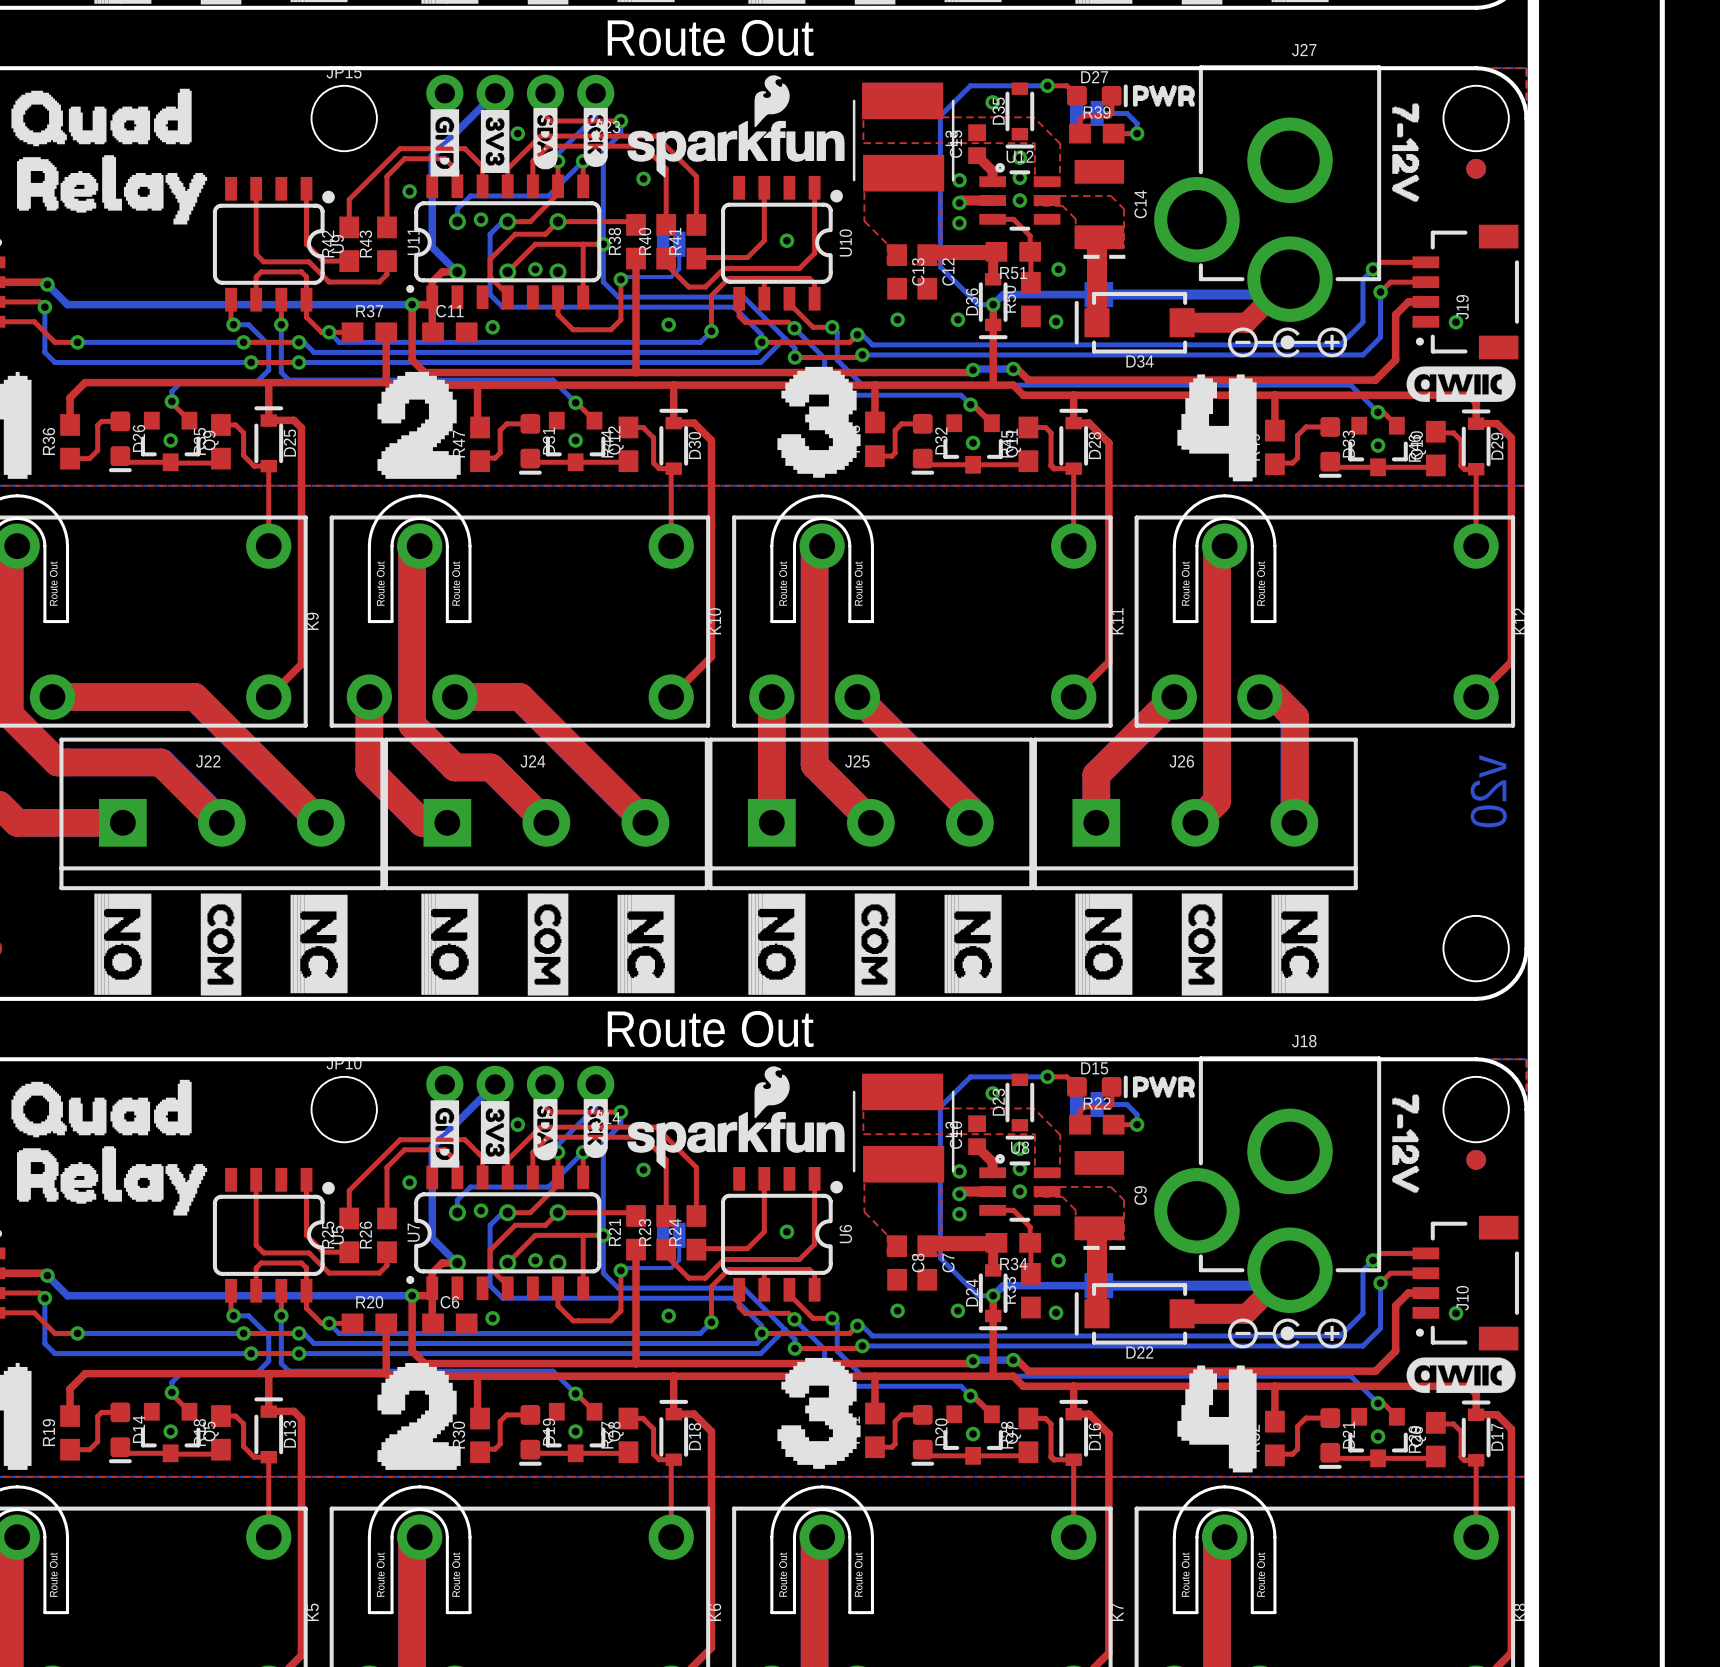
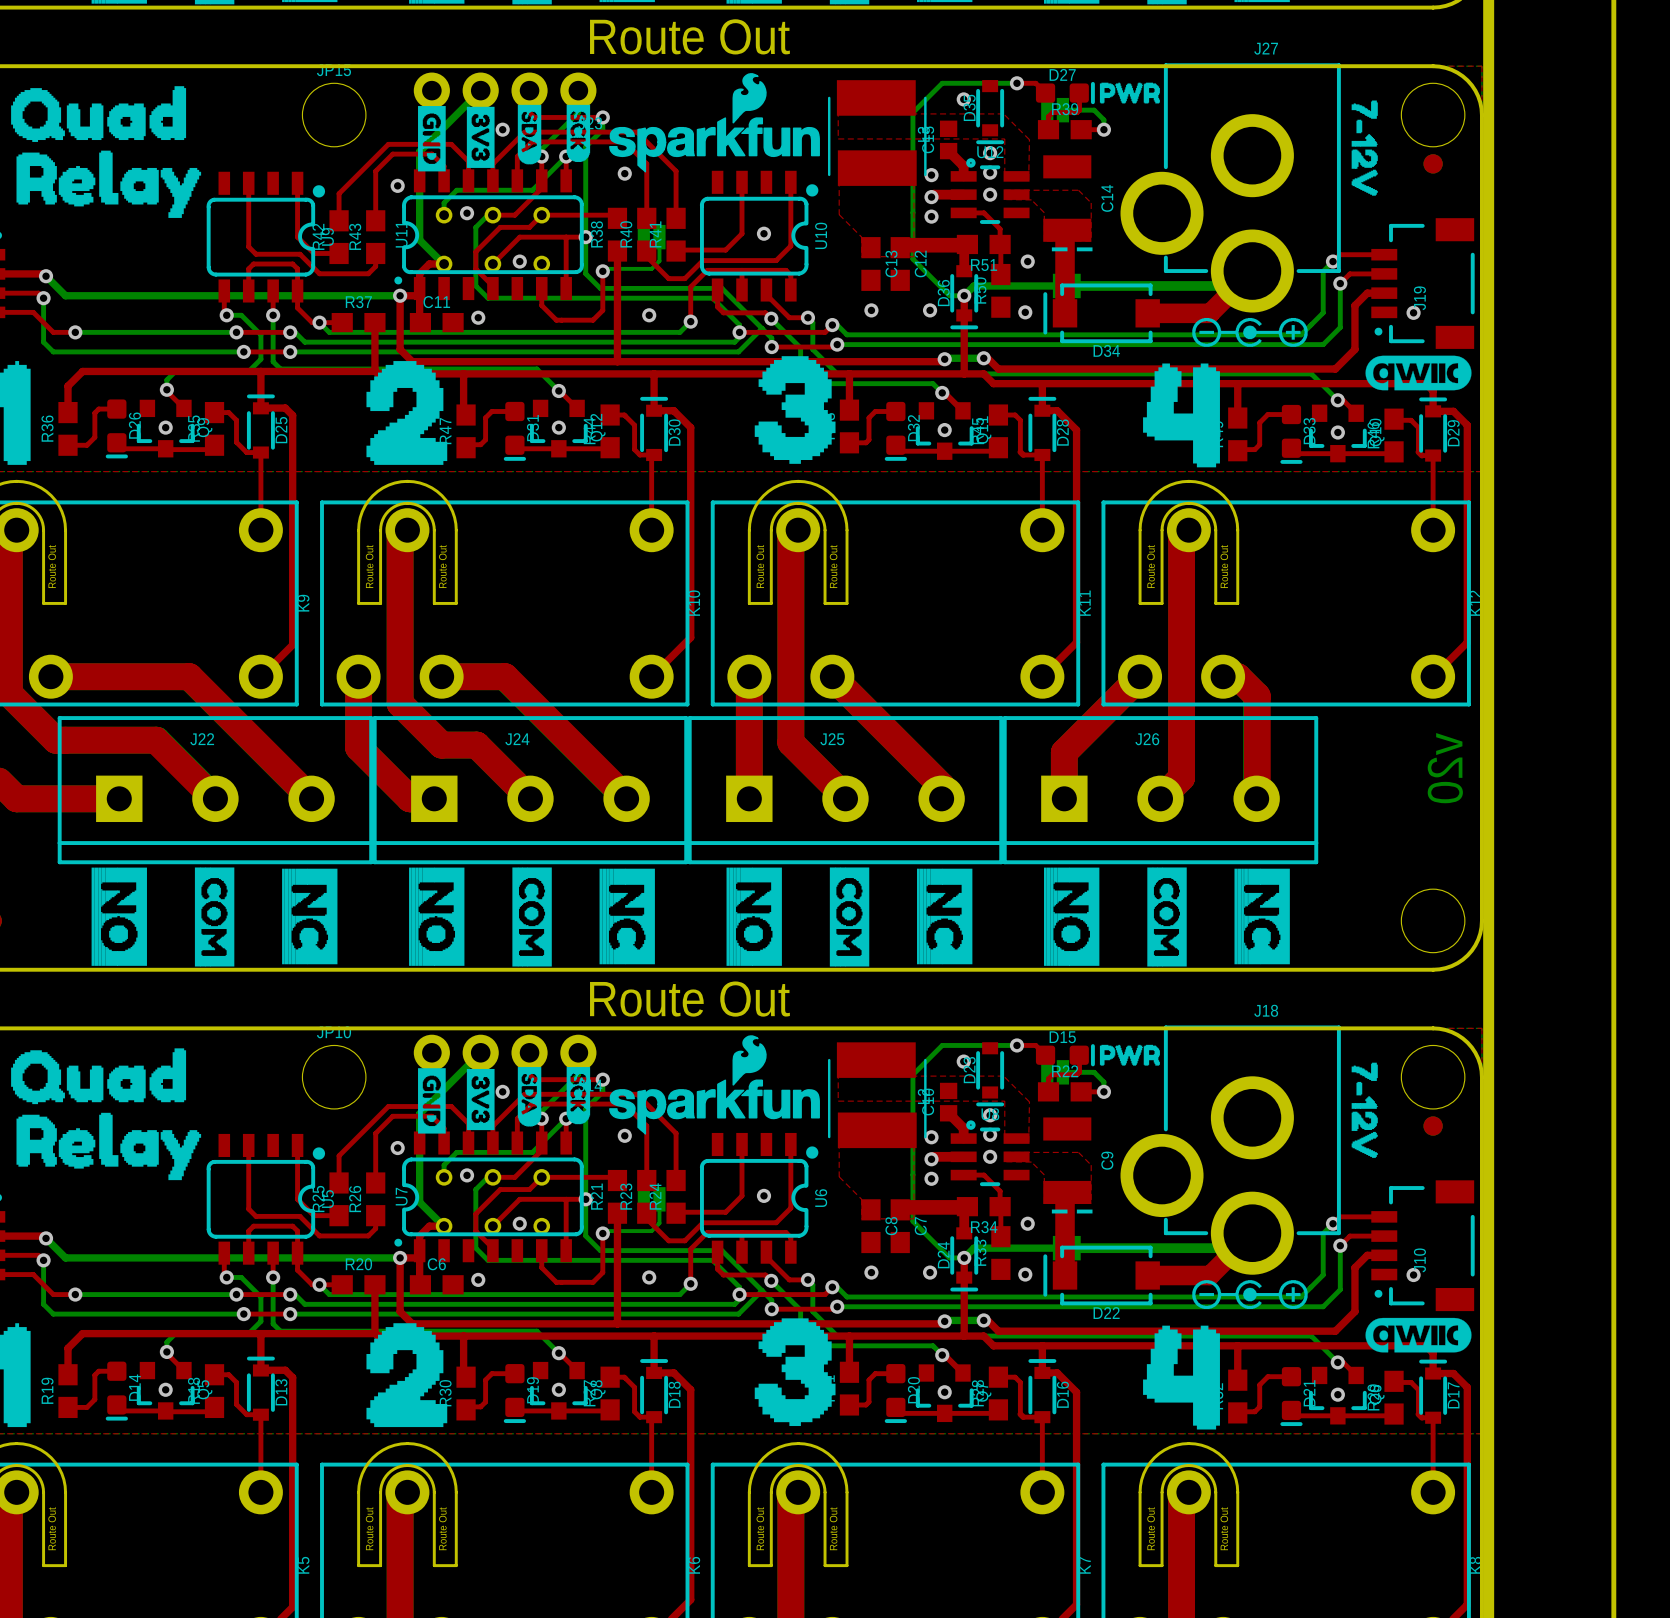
part footprint: [1069, 100, 1104, 127] -> [1041, 97, 1070, 123]
part footprint: [1069, 1091, 1104, 1118] -> [1041, 1060, 1070, 1085]

